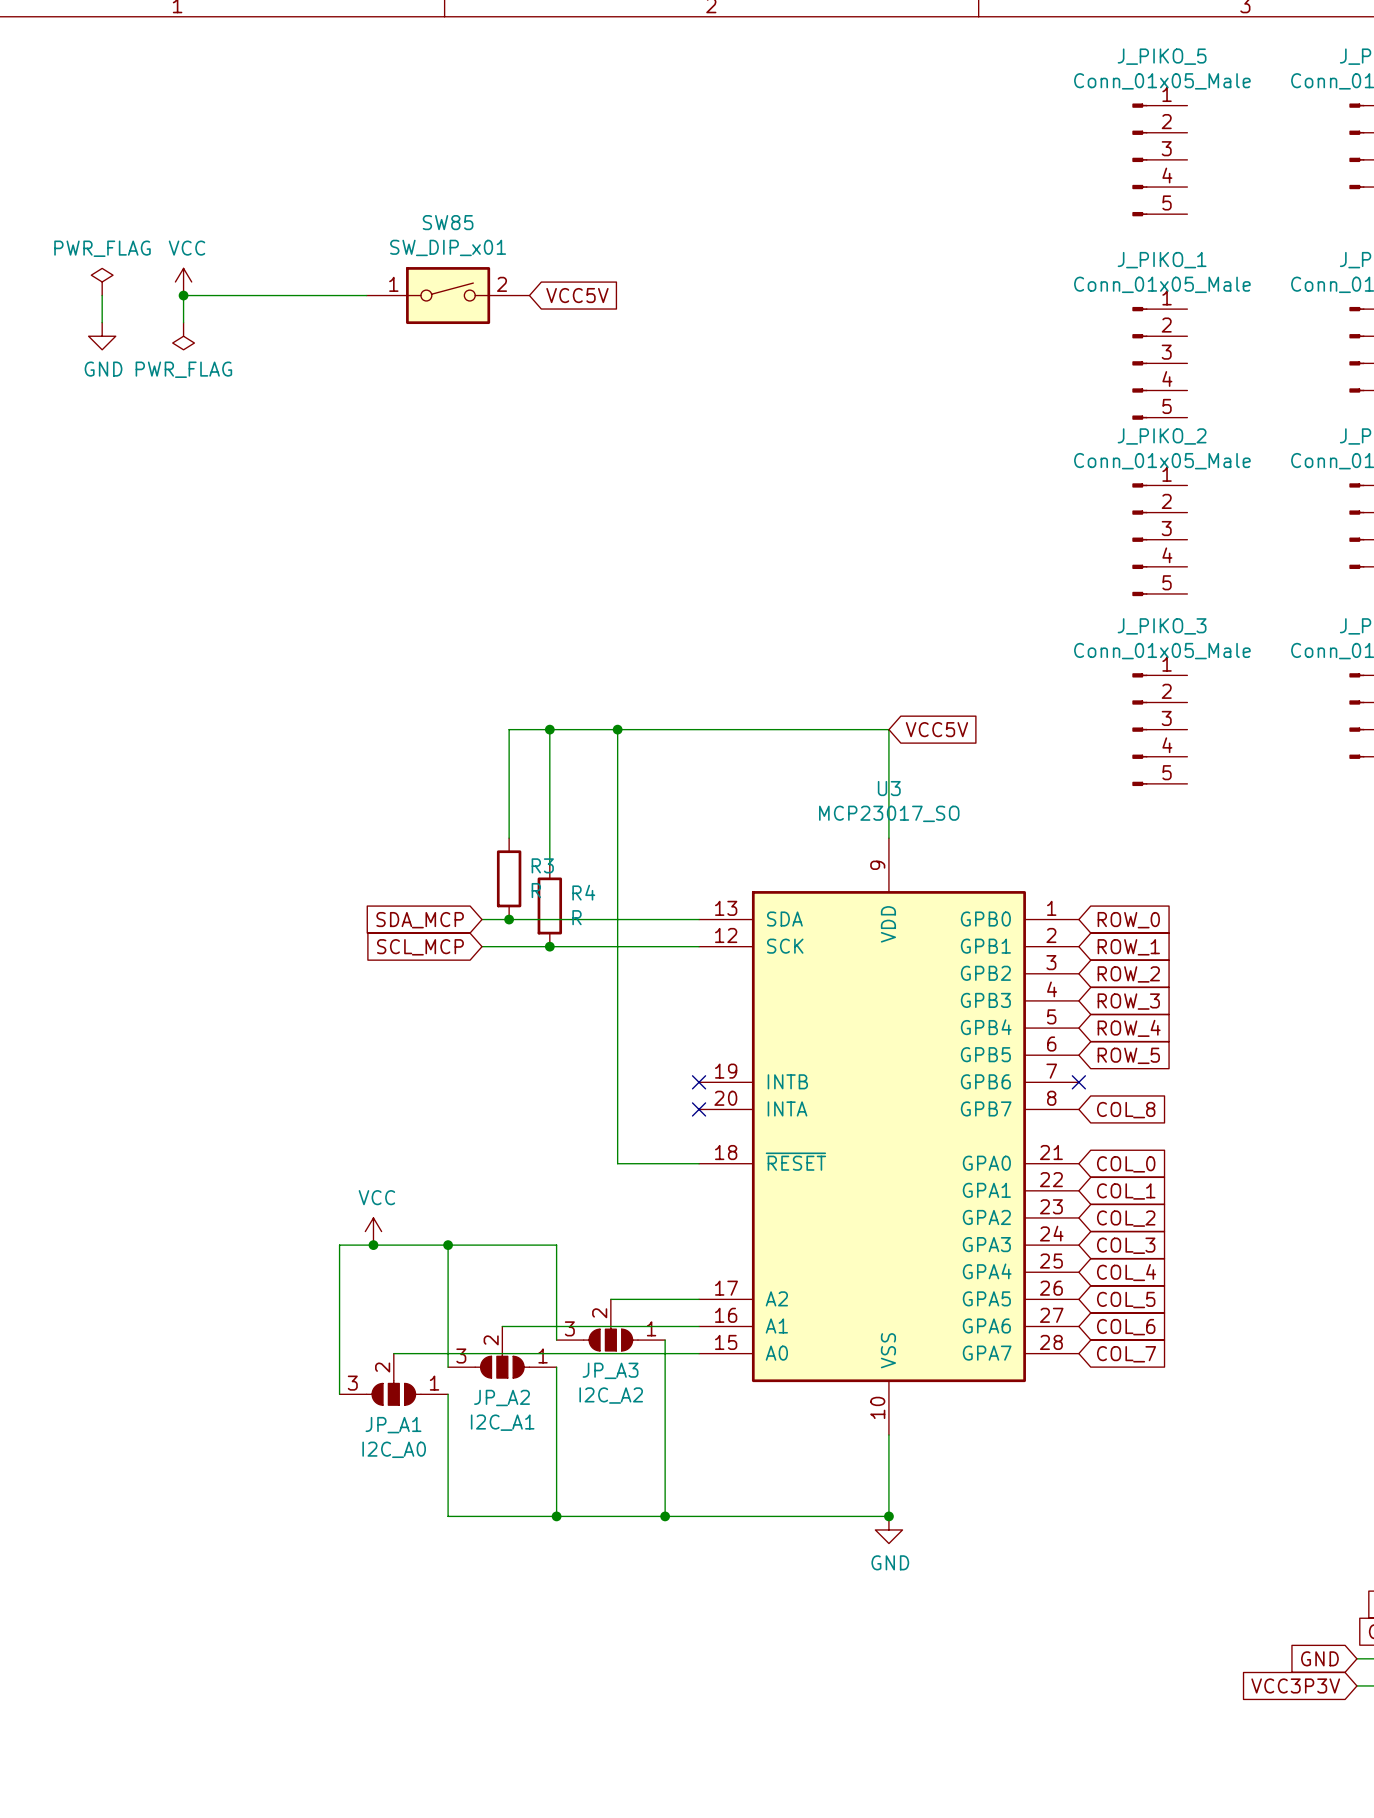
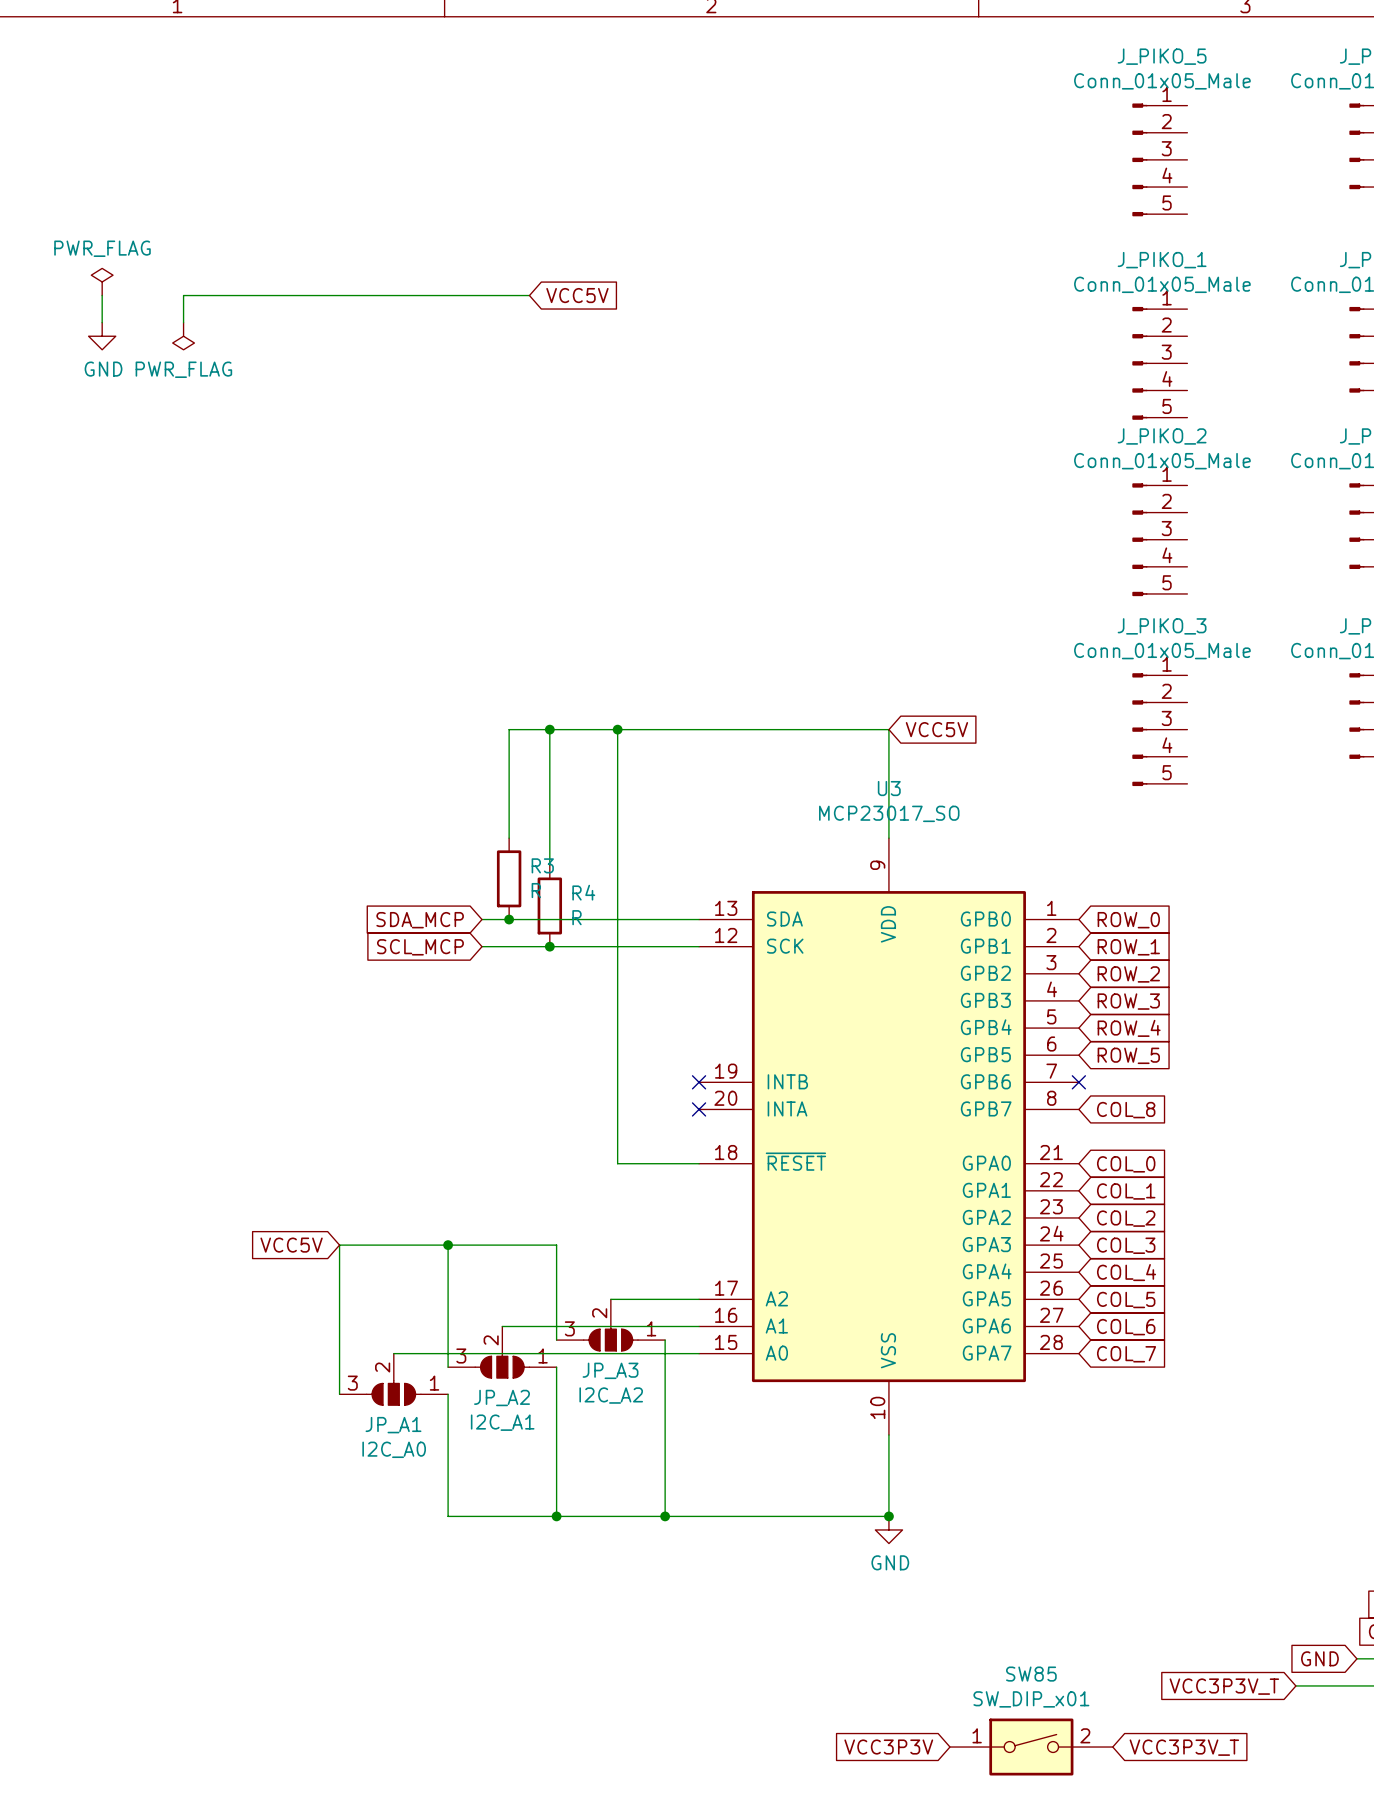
power symbol: VCC (183, 281) -> none
junction: (183, 295) -> none
SW85 position: (448, 295) -> (1031, 1747)
power symbol: VCC (373, 1231) -> none
global label: none -> VCC5V (291, 1245)
junction: (373, 1245) -> none
wire: none -> (1295, 1685) (1356, 1685)
global label: VCC3P3V (1295, 1685) -> VCC3P3V_T (1224, 1686)
global label: none -> VCC3P3V (888, 1747)
global label: none -> VCC3P3V_T (1184, 1747)

